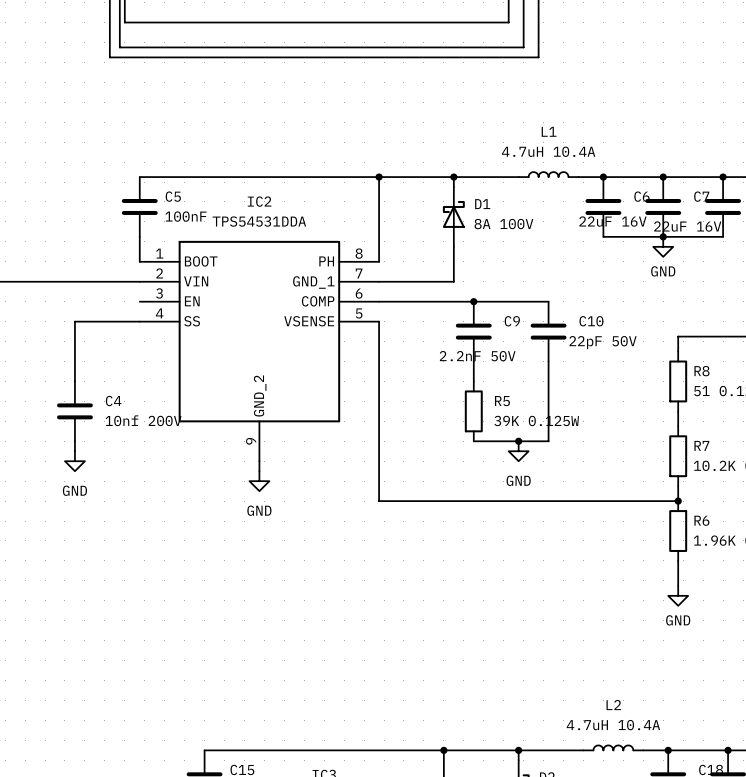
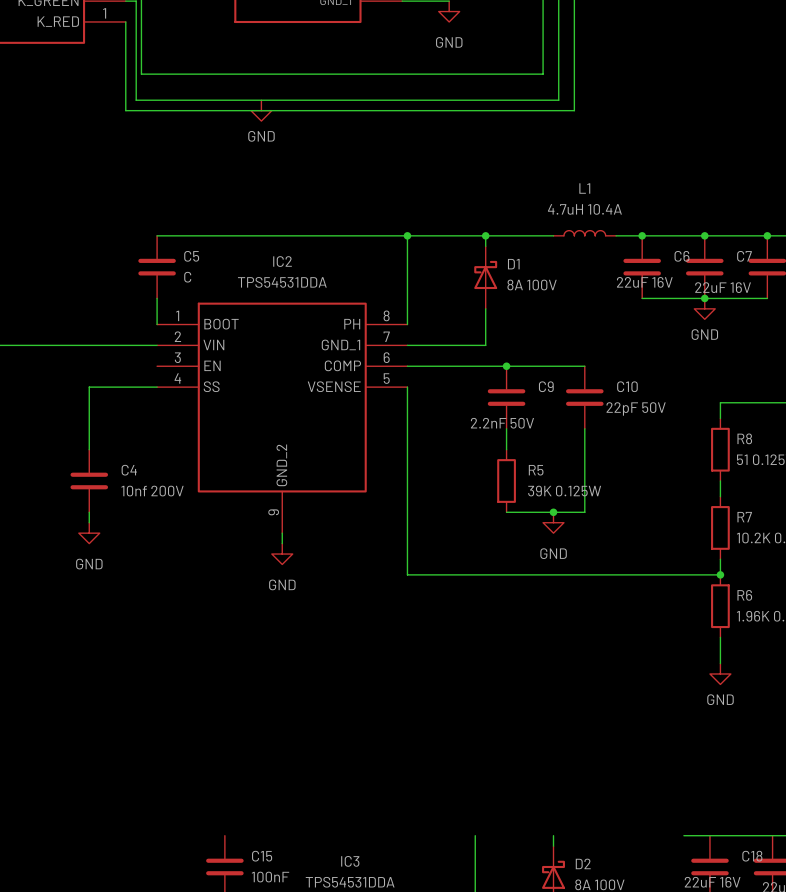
power symbol: none -> GND (261, 110)
C5 value: 100nF (186, 216) -> C (187, 277)
L2: 4.7uH 10.4A (613, 747) -> none
wire: (204, 750) (583, 750) -> none
junction: (443, 750) -> none
junction: (518, 750) -> none
junction: (668, 750) -> none
junction: (728, 750) -> none

